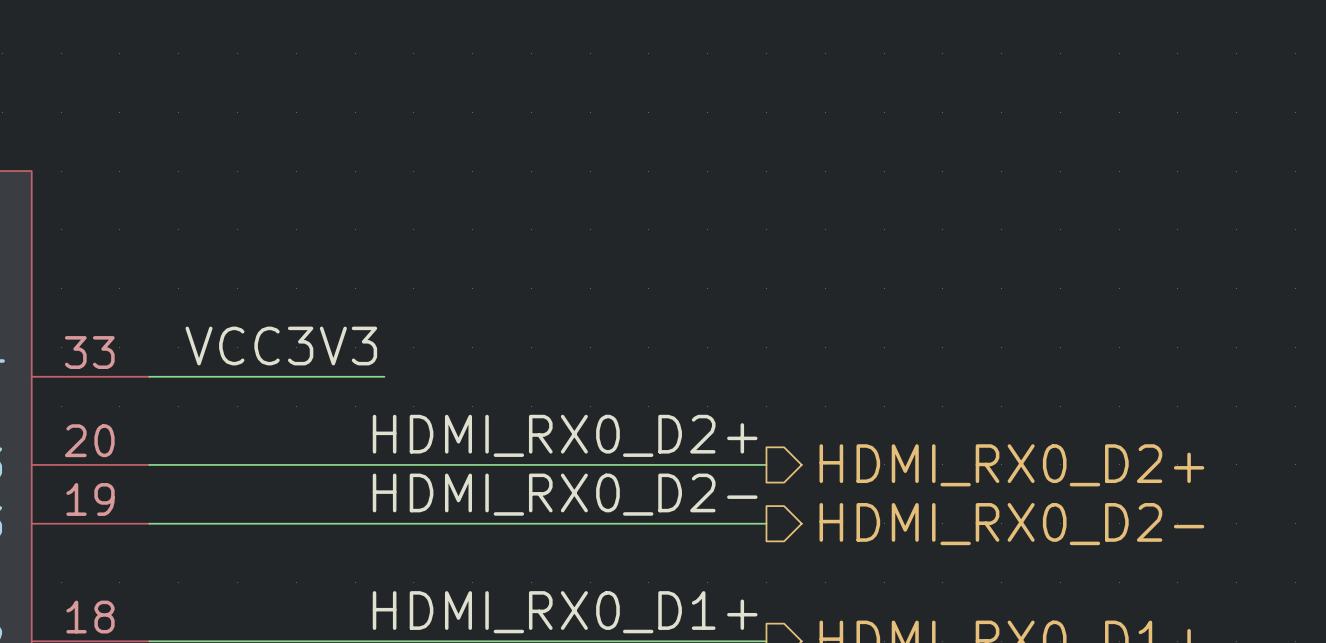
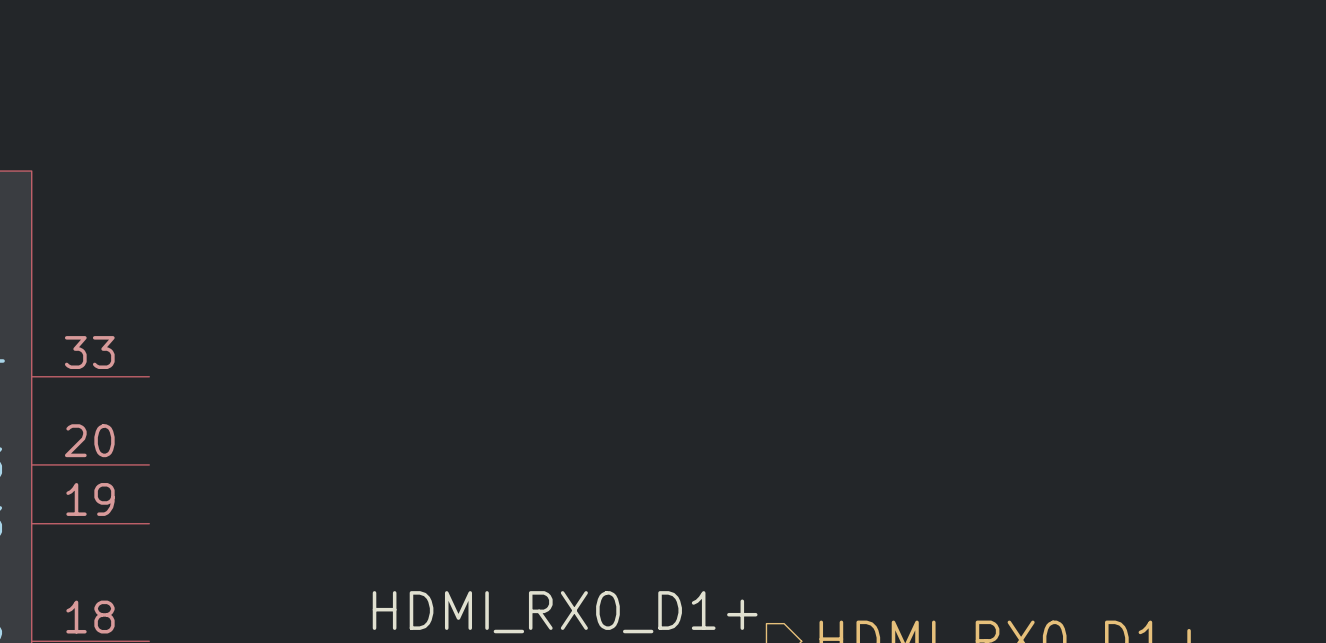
label: VCC3V3 (281, 346) -> none
wire: (149, 376) (384, 376) -> none
label: HDMI_RX0_D2+ (565, 435) -> none
wire: (149, 464) (766, 464) -> none
hierarchical label: HDMI_RX0_D2+ (1011, 465) -> none
label: HDMI_RX0_D2- (565, 494) -> none
wire: (149, 523) (766, 523) -> none
hierarchical label: HDMI_RX0_D2- (1011, 524) -> none
wire: (149, 641) (766, 641) -> none

